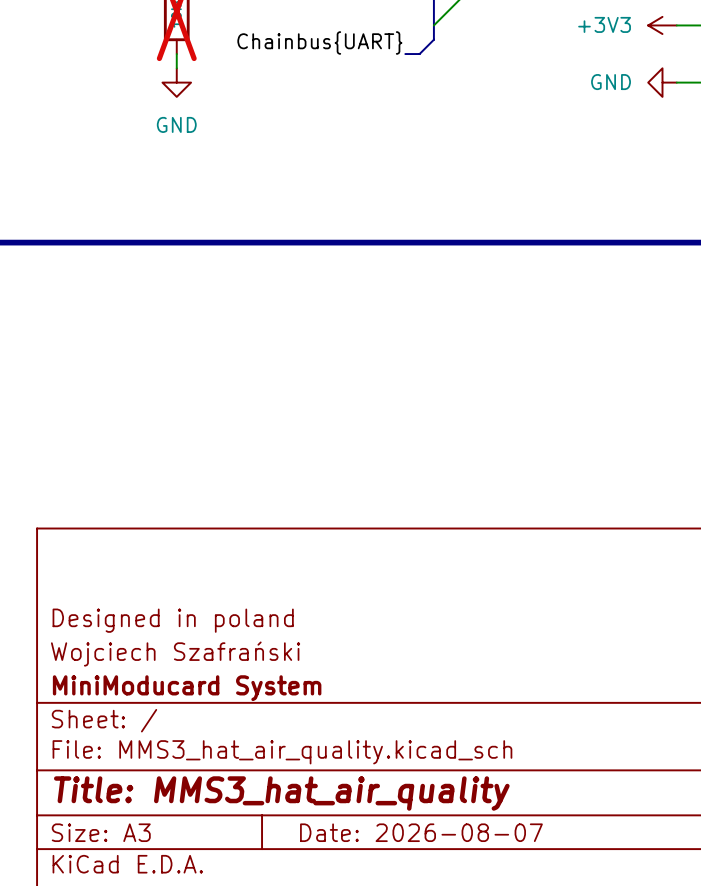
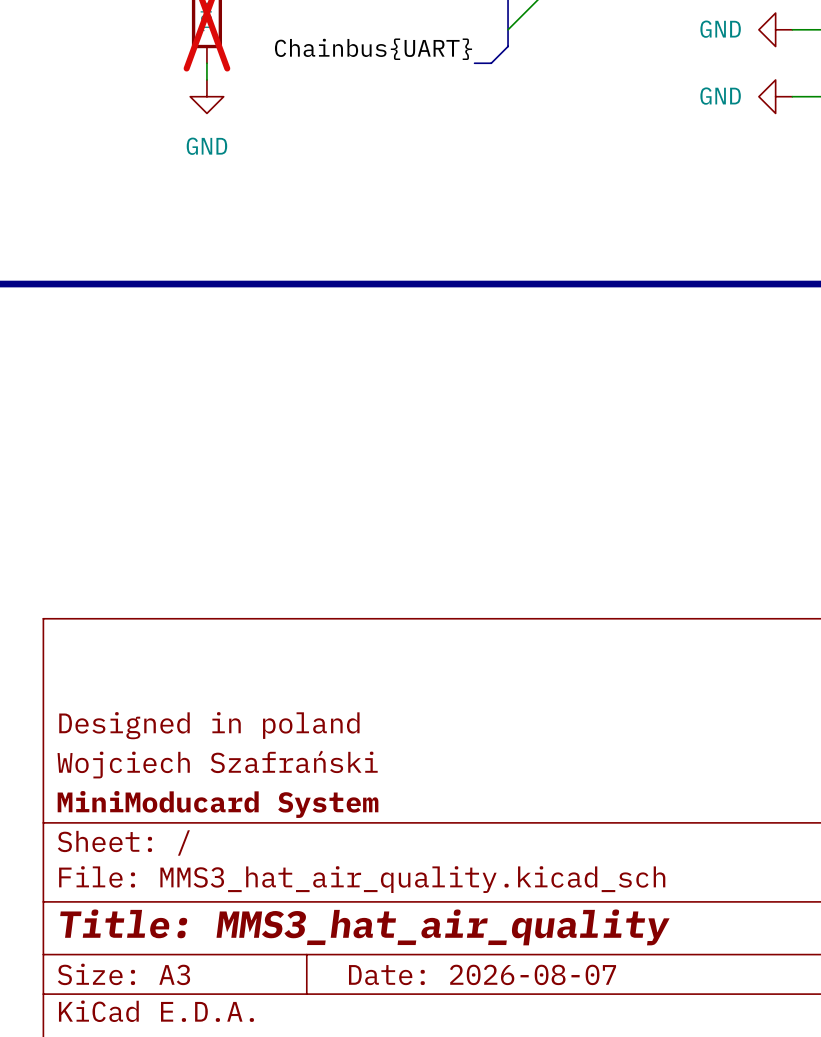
power symbol: +3V3 (662, 25) -> GND (775, 29)

